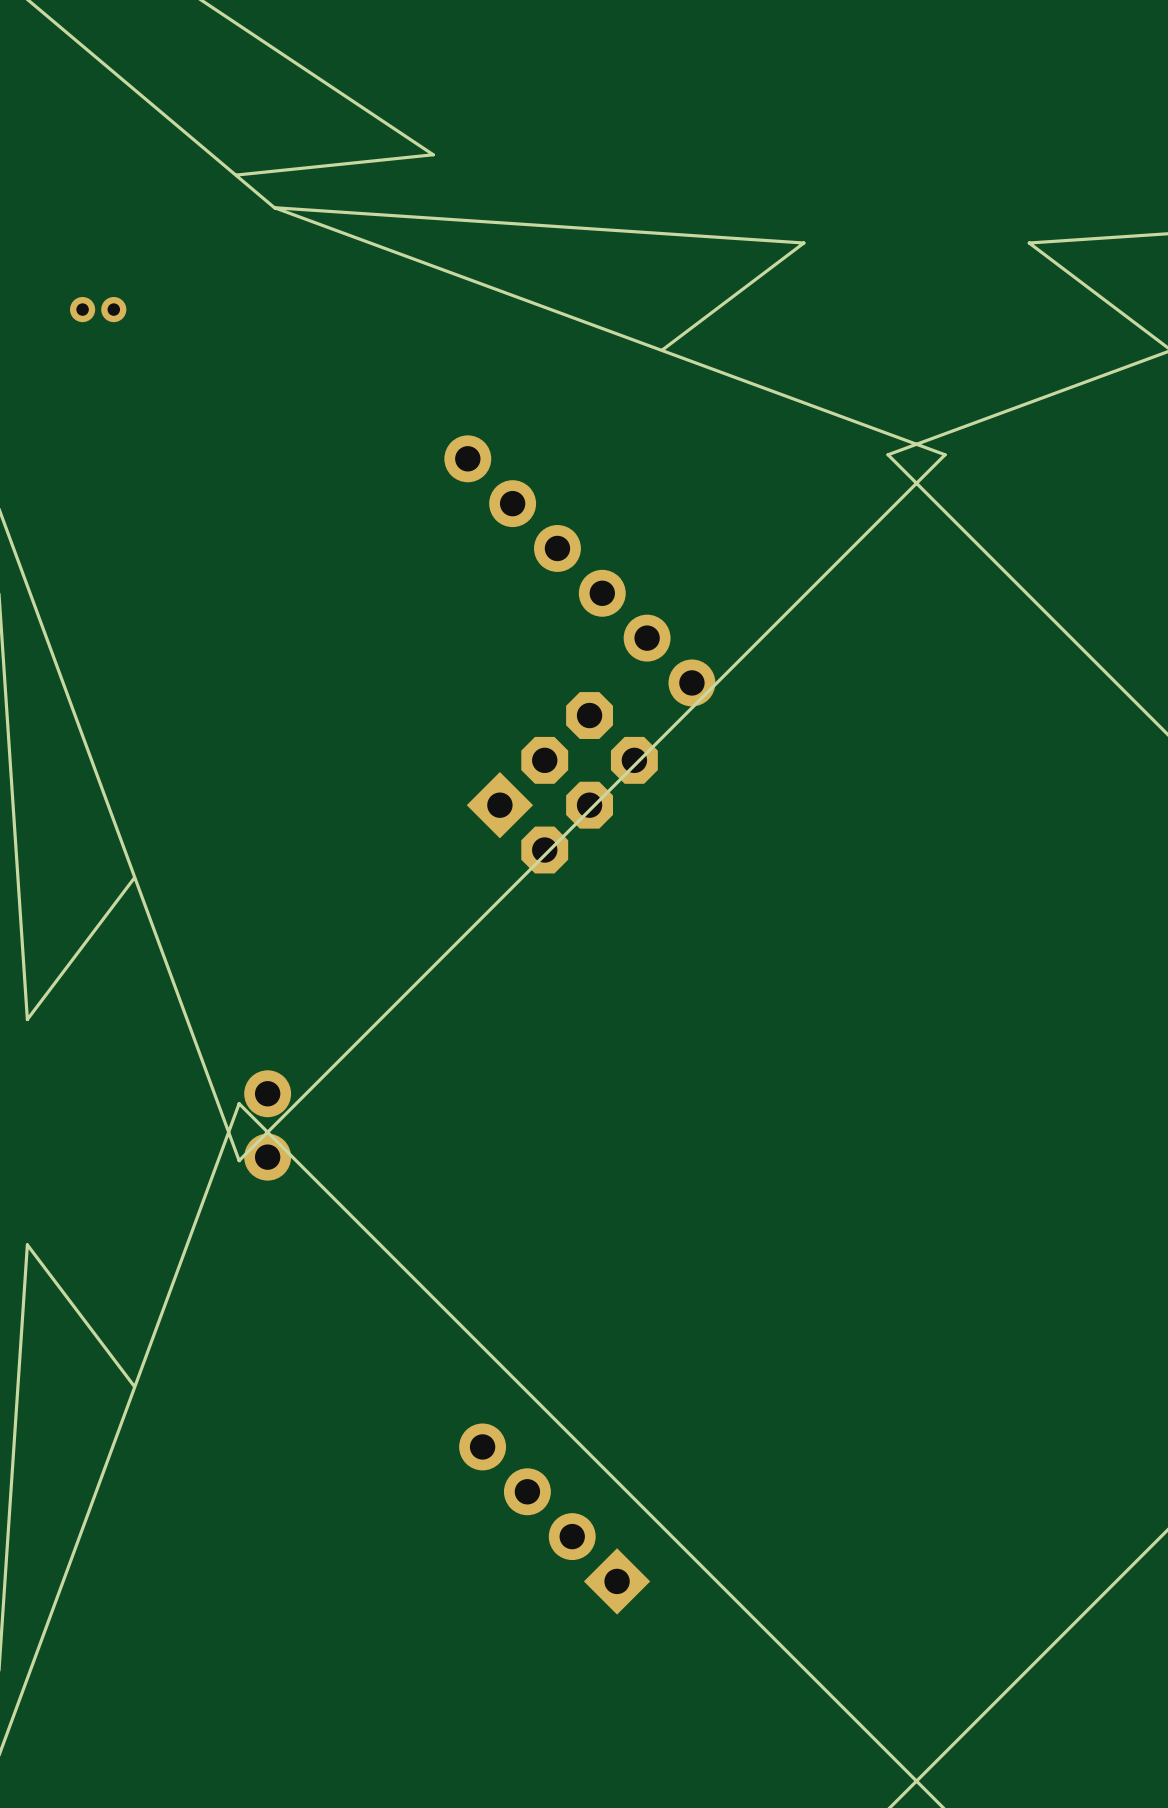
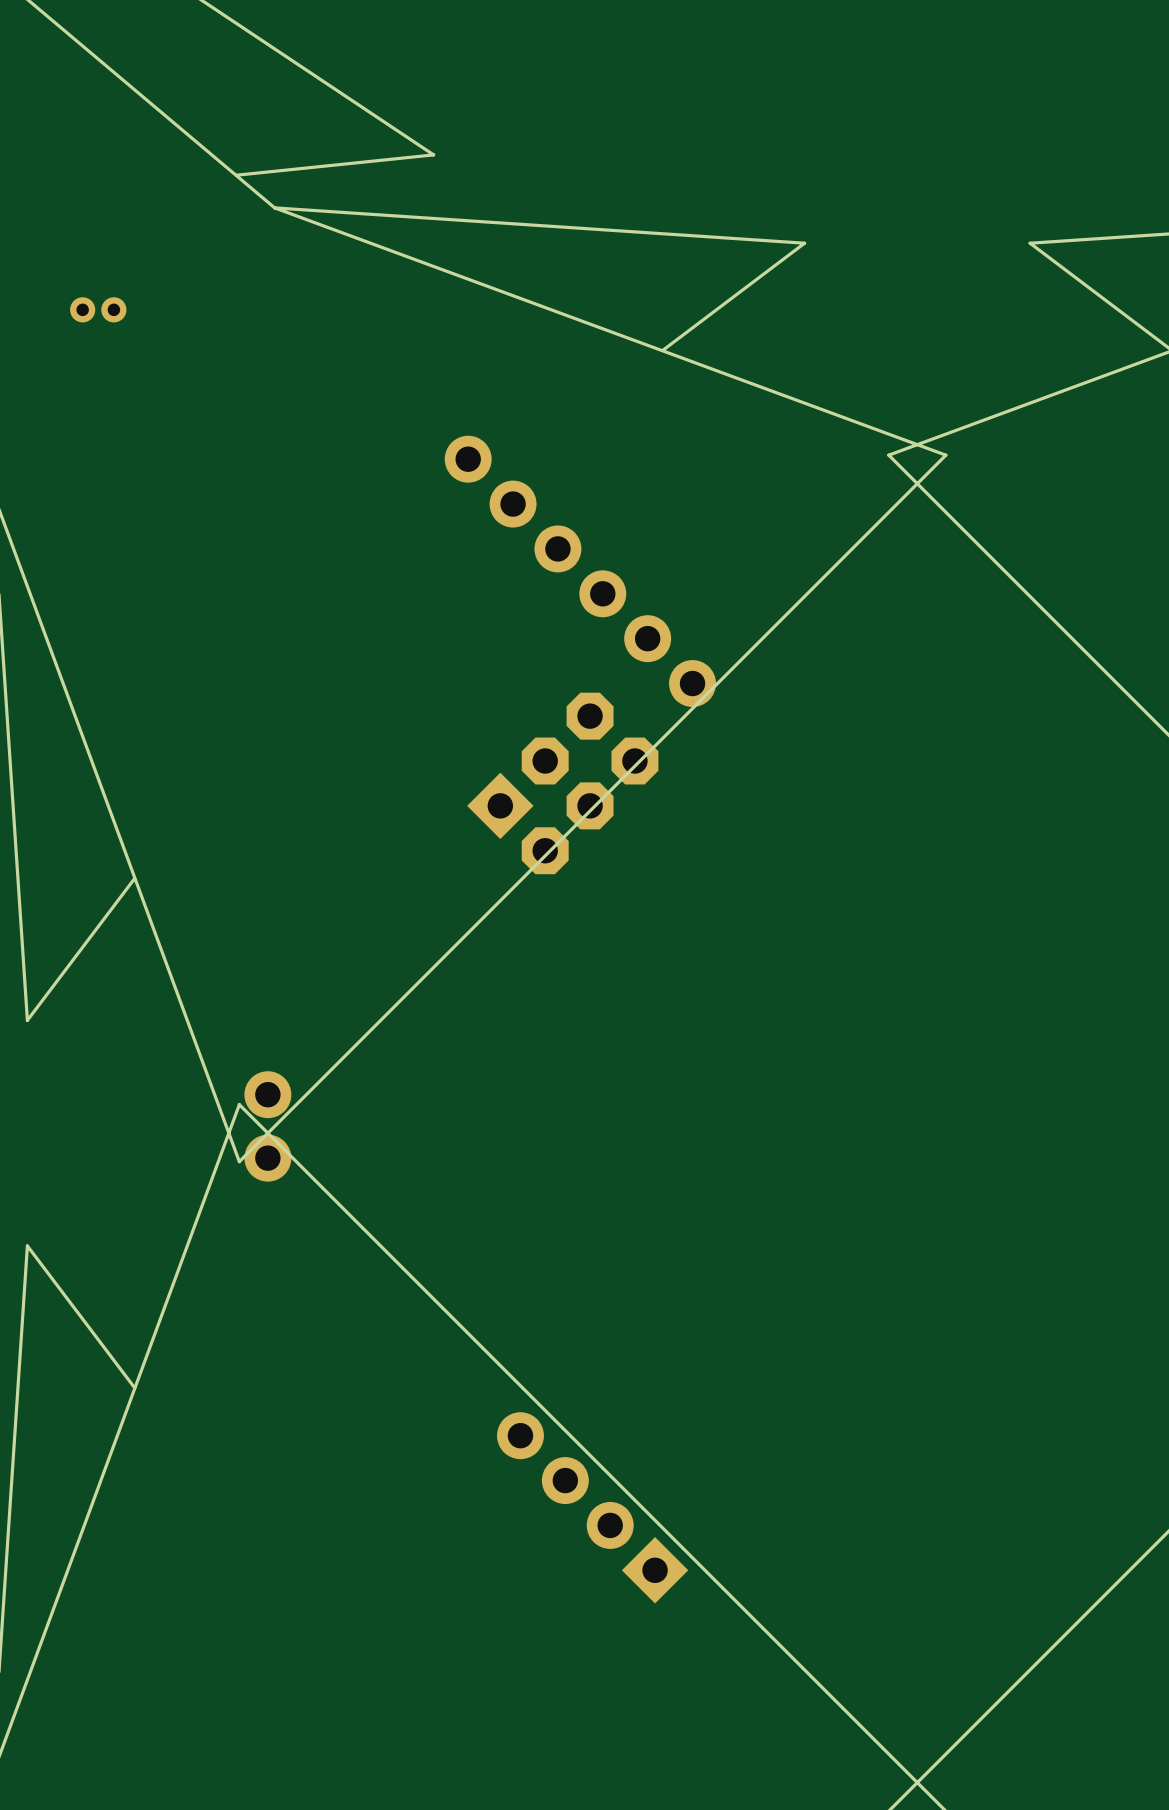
part position: (554, 1519) -> (592, 1507)

